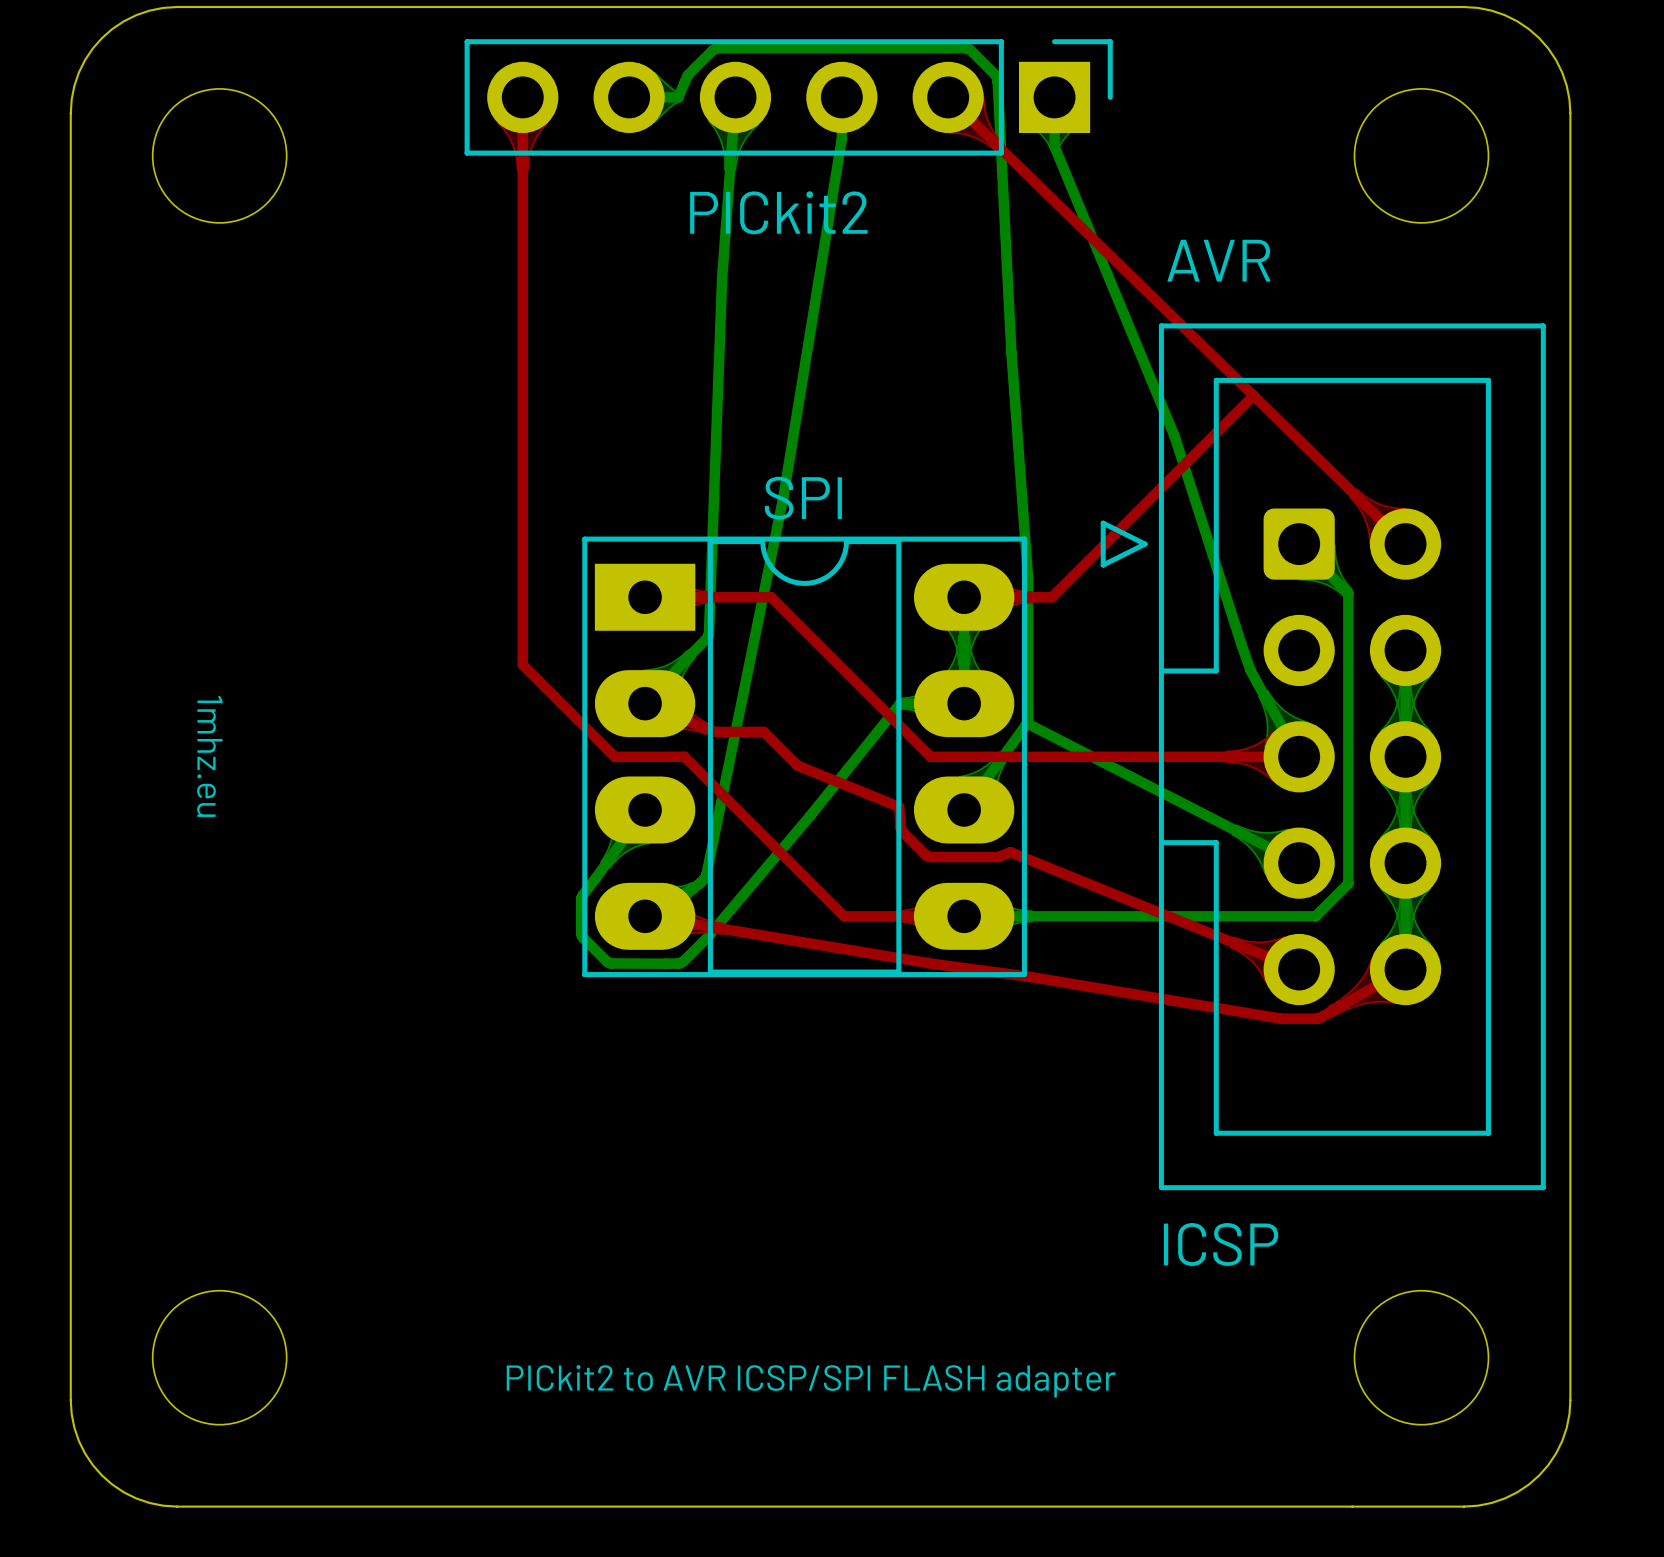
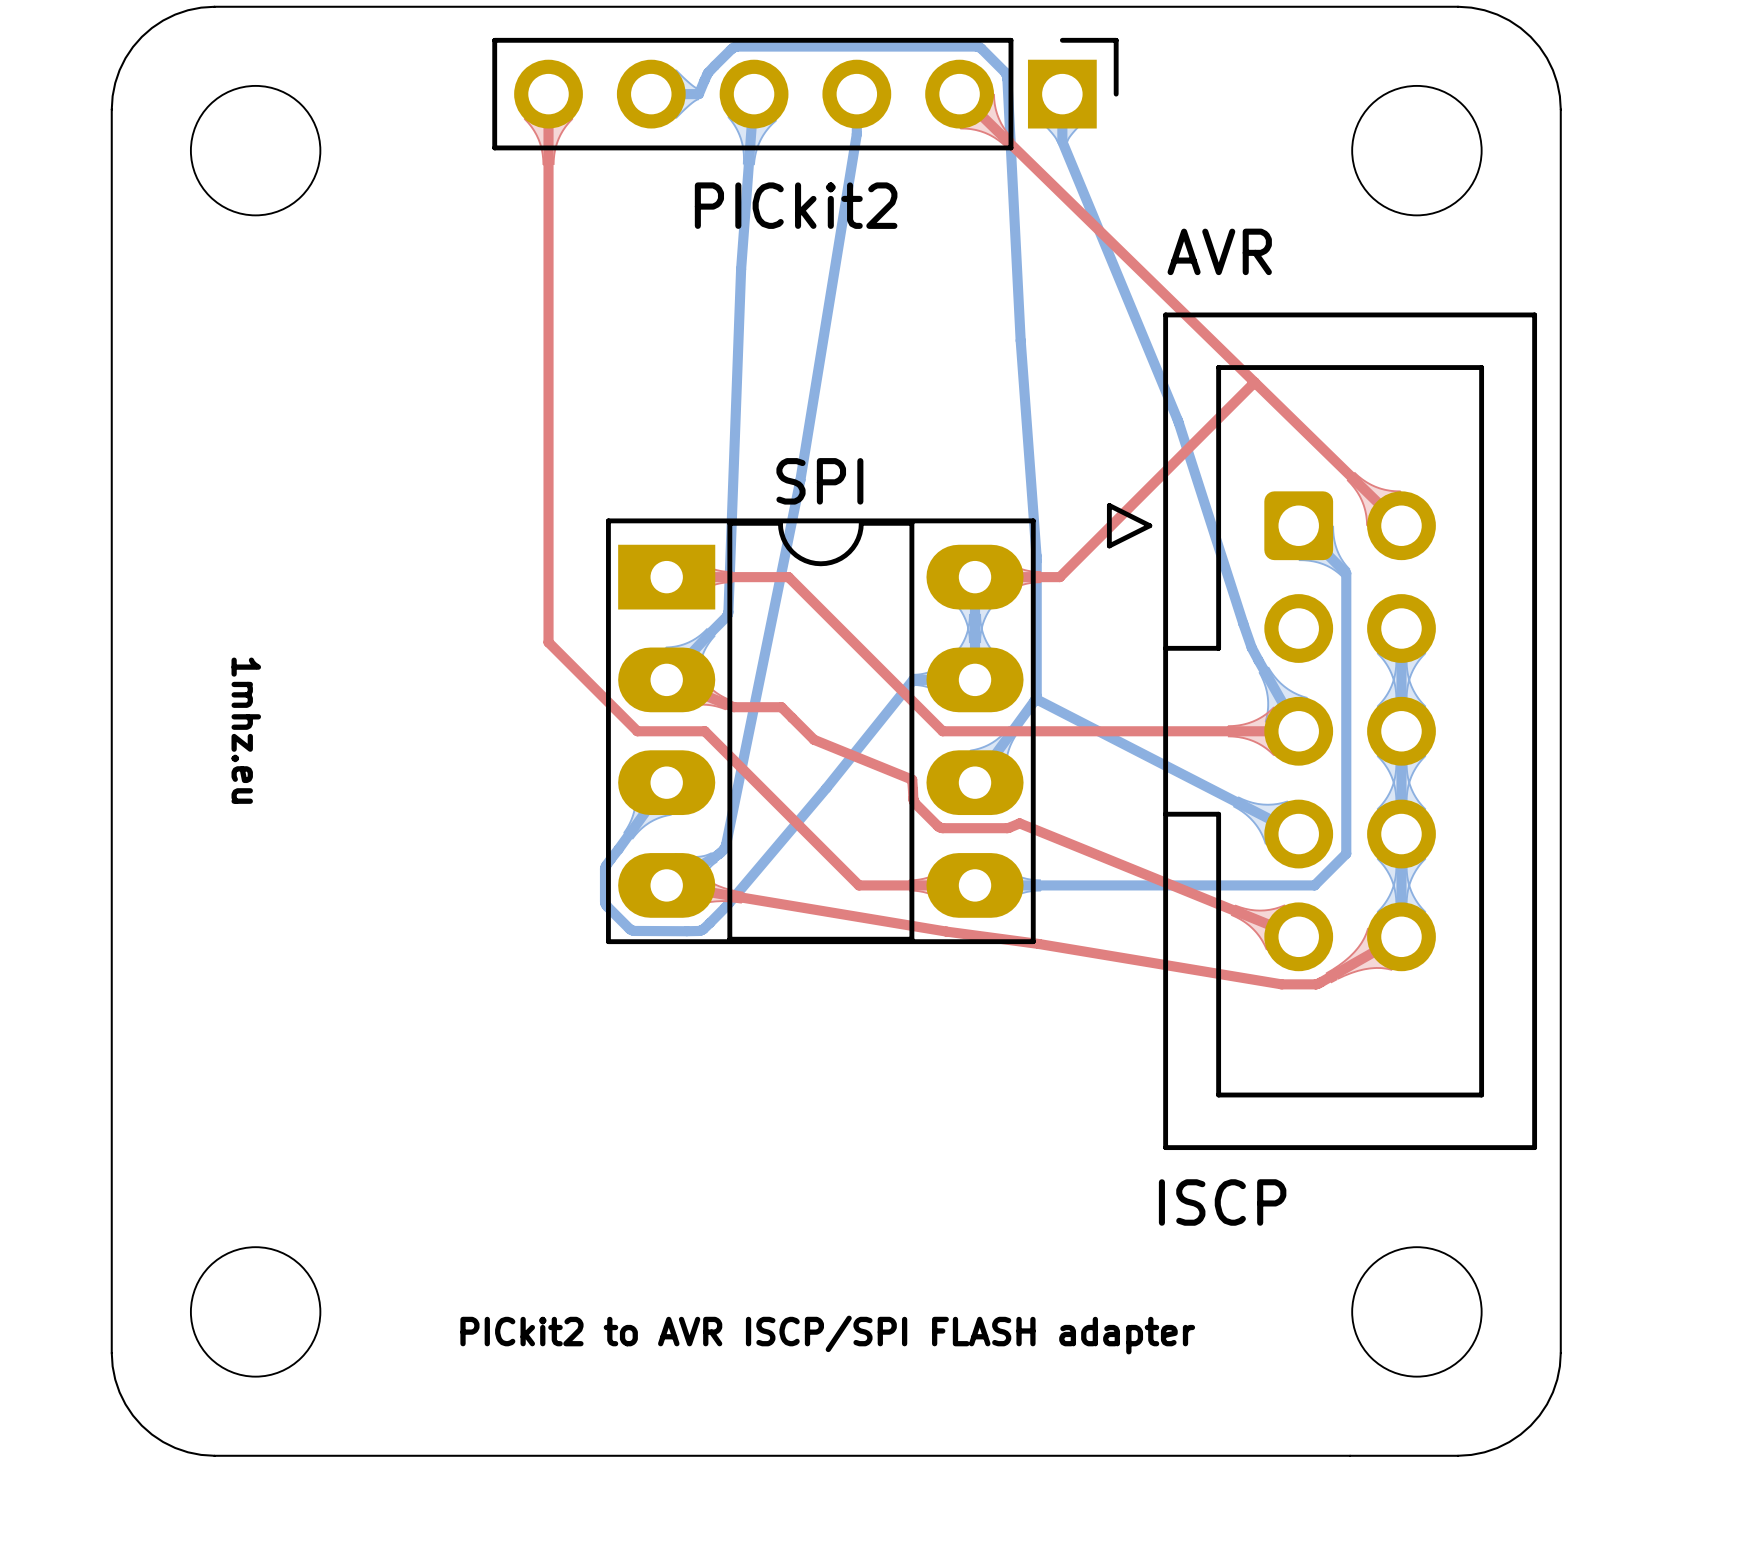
text: ICSP (1221, 1244) -> ISCP (1222, 1202)
text: PICkit2 to AVR ICSP/SPI FLASH adapter (811, 1381) -> PICkit2 to AVR ISCP/SPI FLASH adapter (827, 1335)

